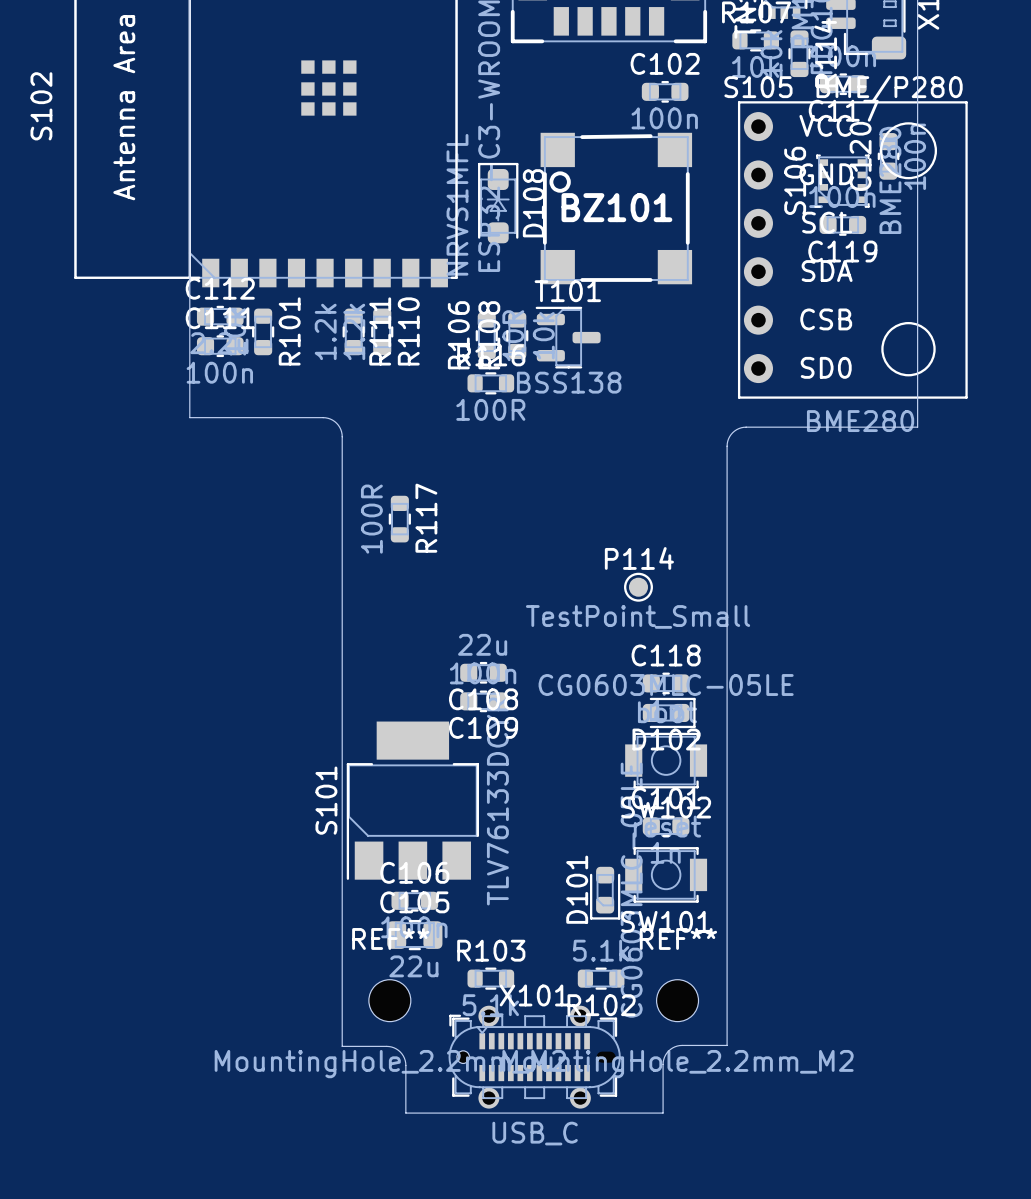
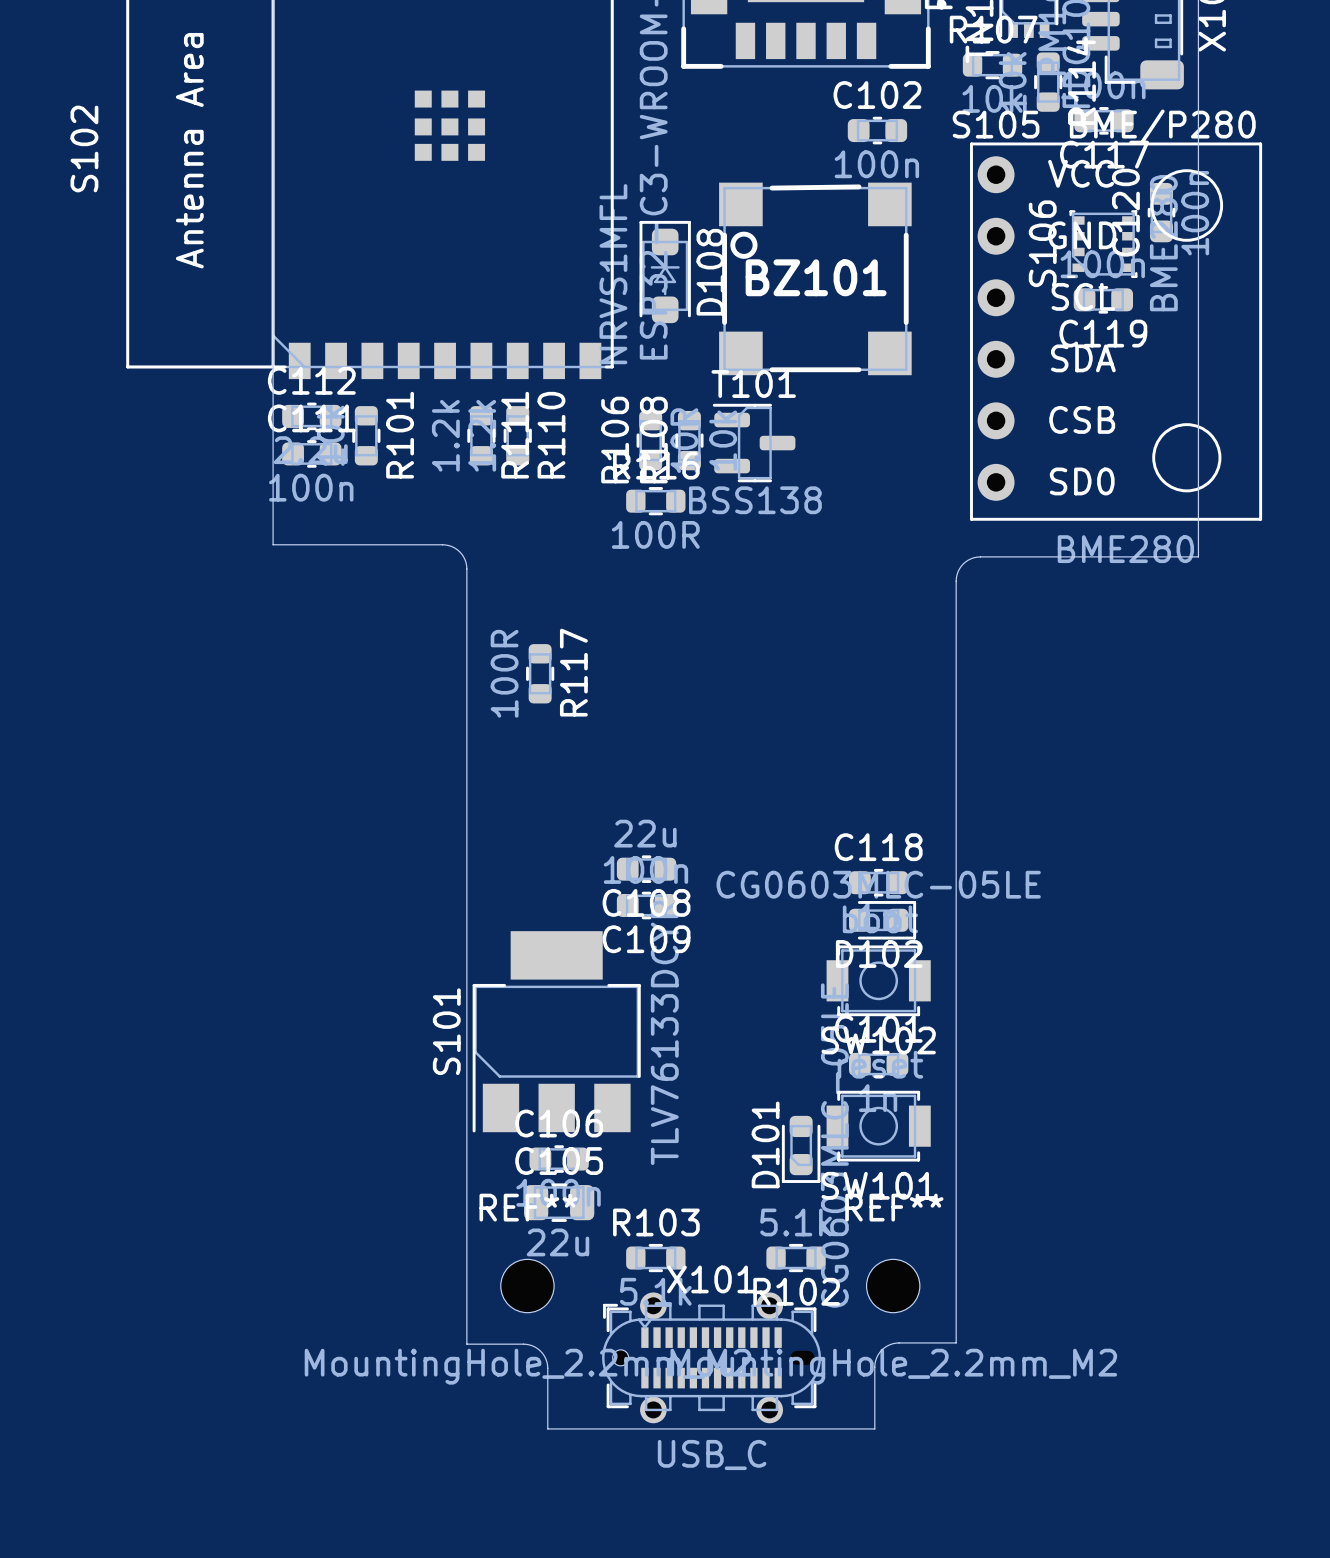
P114: TestPoint_Small (638, 587) -> none

